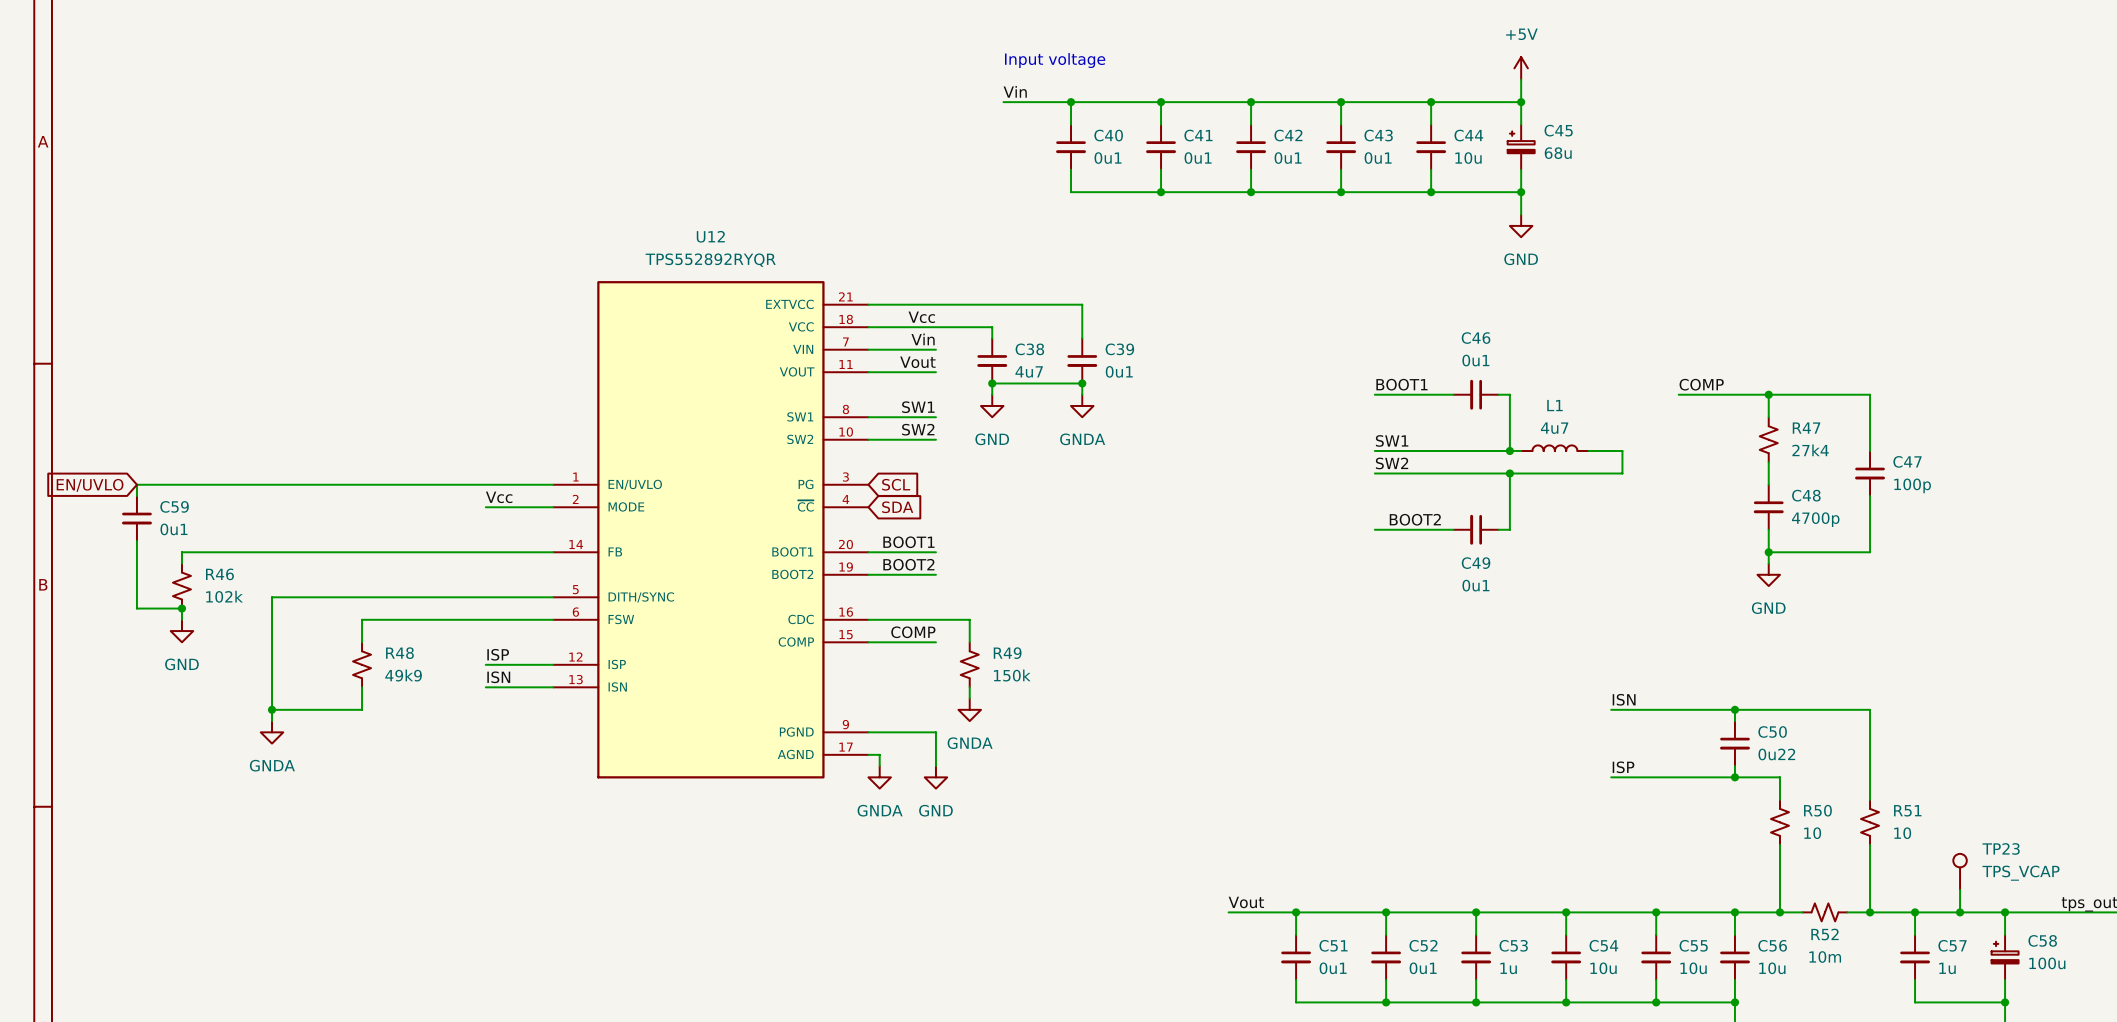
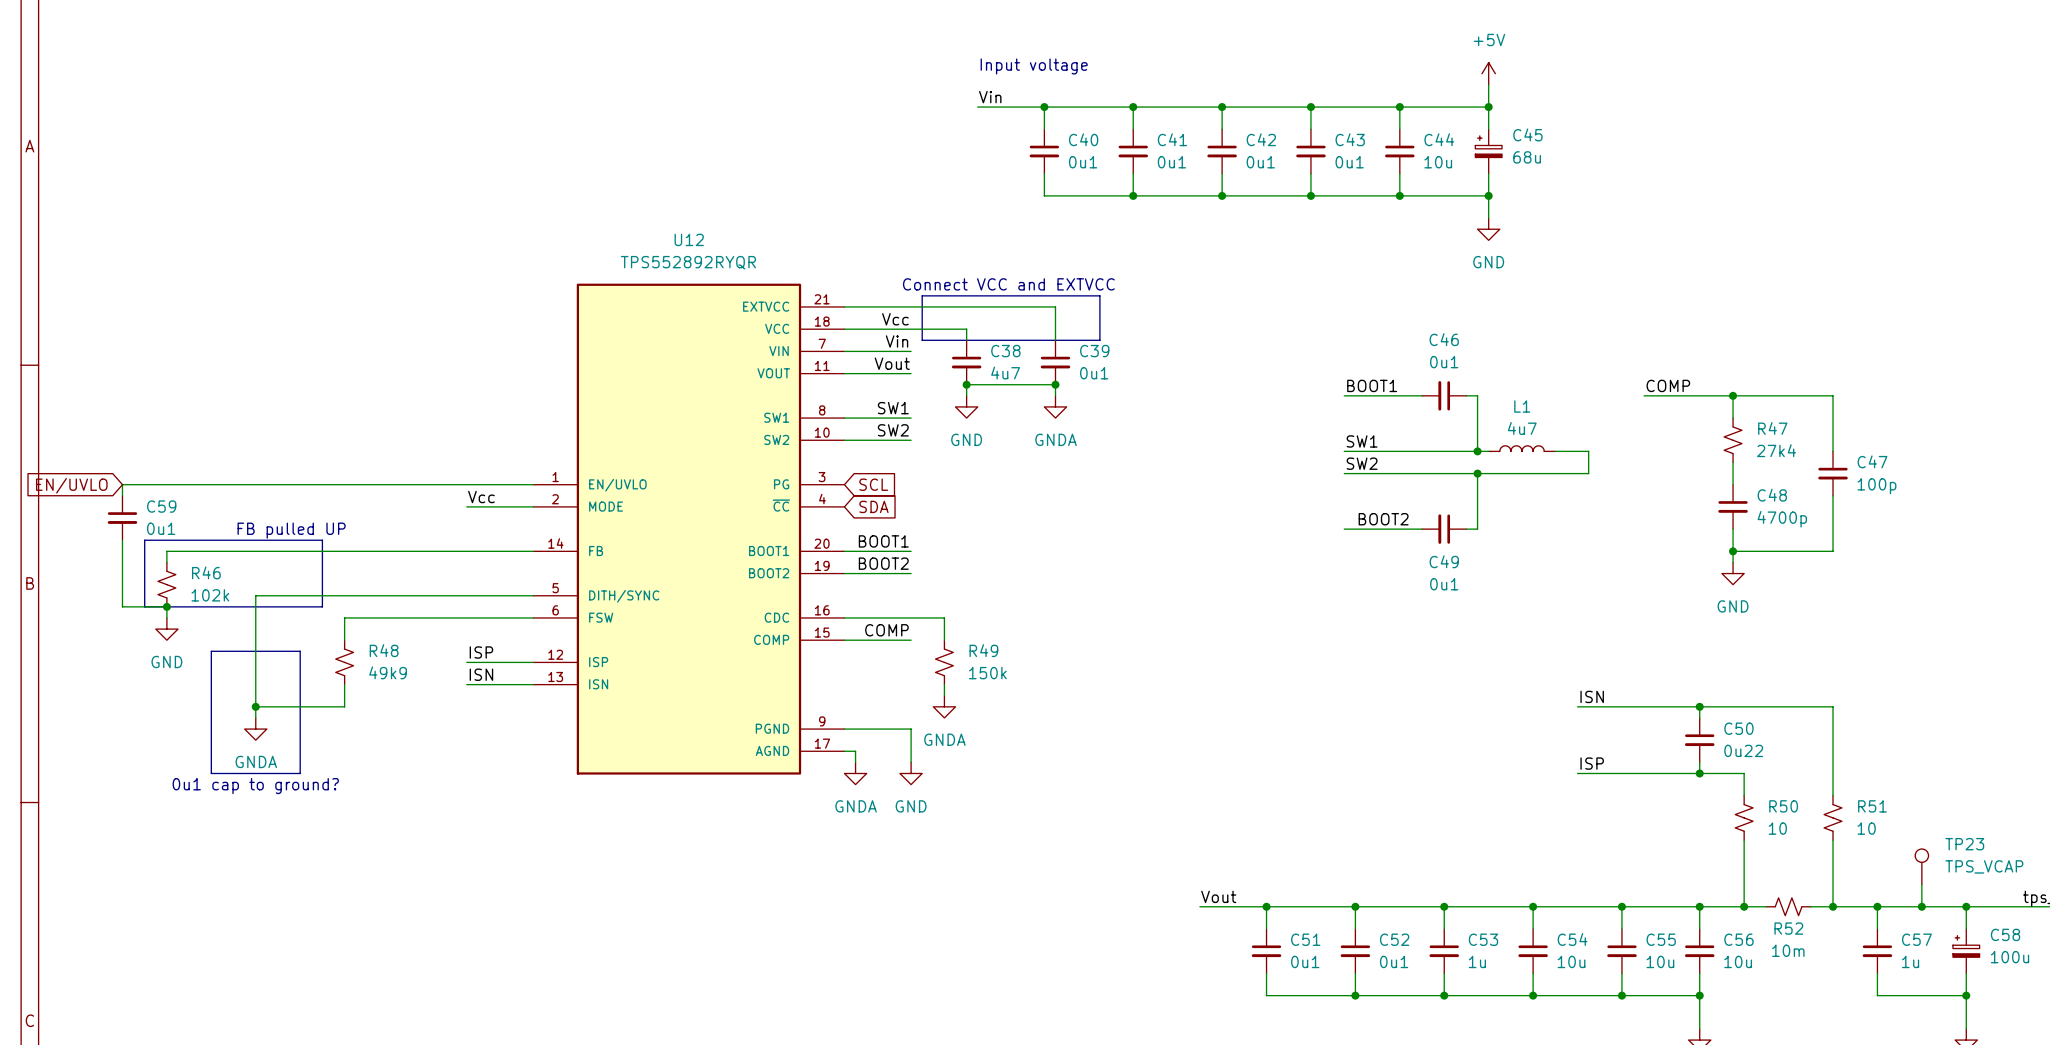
text: none -> Connect VCC and EXTVCC (1008, 284)
line: none -> (922, 295) (1099, 295) (1099, 340) (922, 340) (922, 295)
text: none -> FB pulled UP (291, 530)
line: none -> (144, 540) (322, 540) (322, 606) (144, 606) (144, 540)
line: none -> (211, 651) (300, 651) (300, 773) (211, 773) (211, 651)
text: none -> 0u1 cap to ground? (255, 786)

